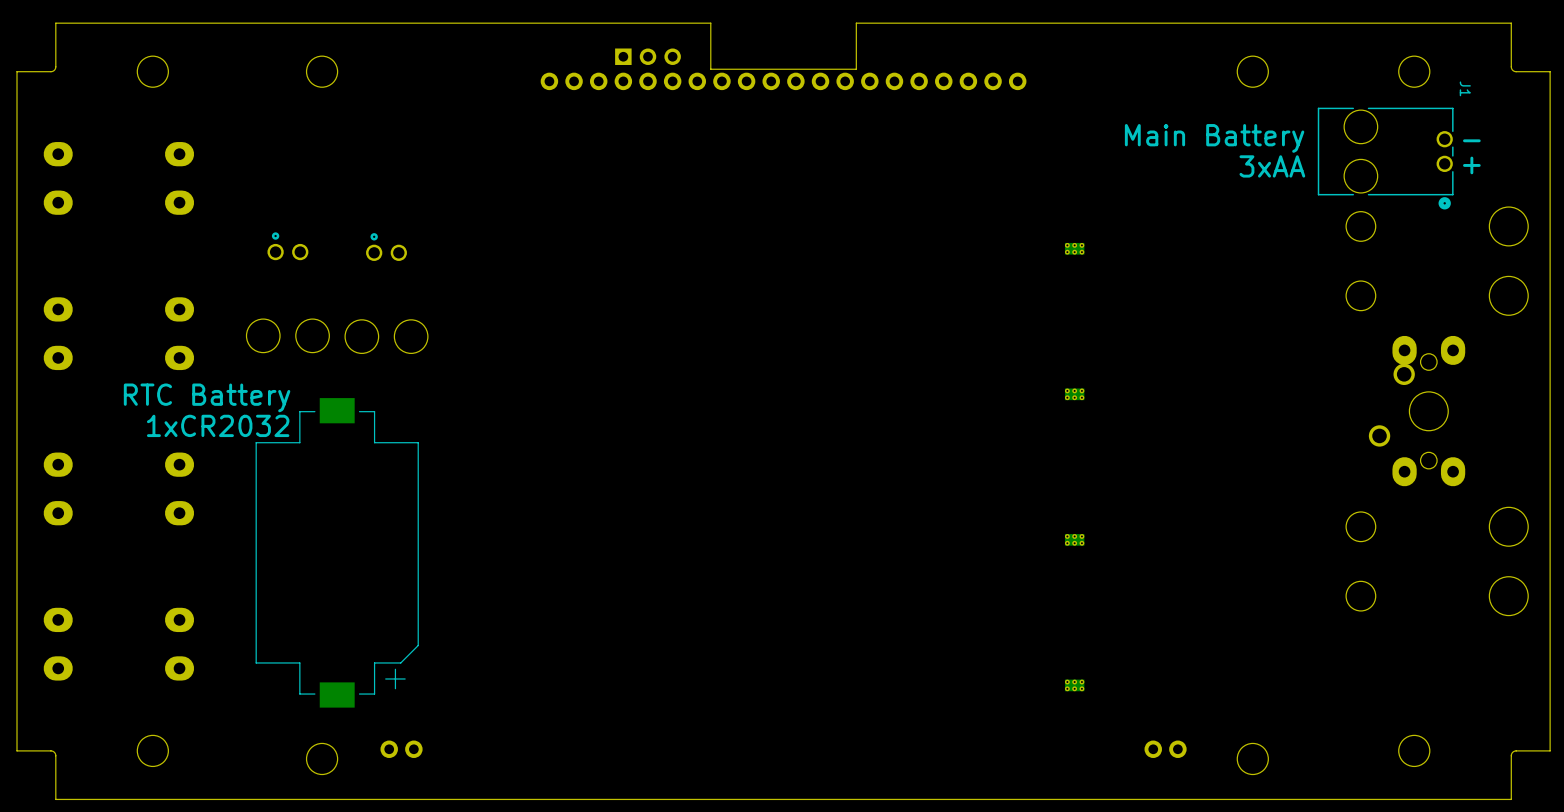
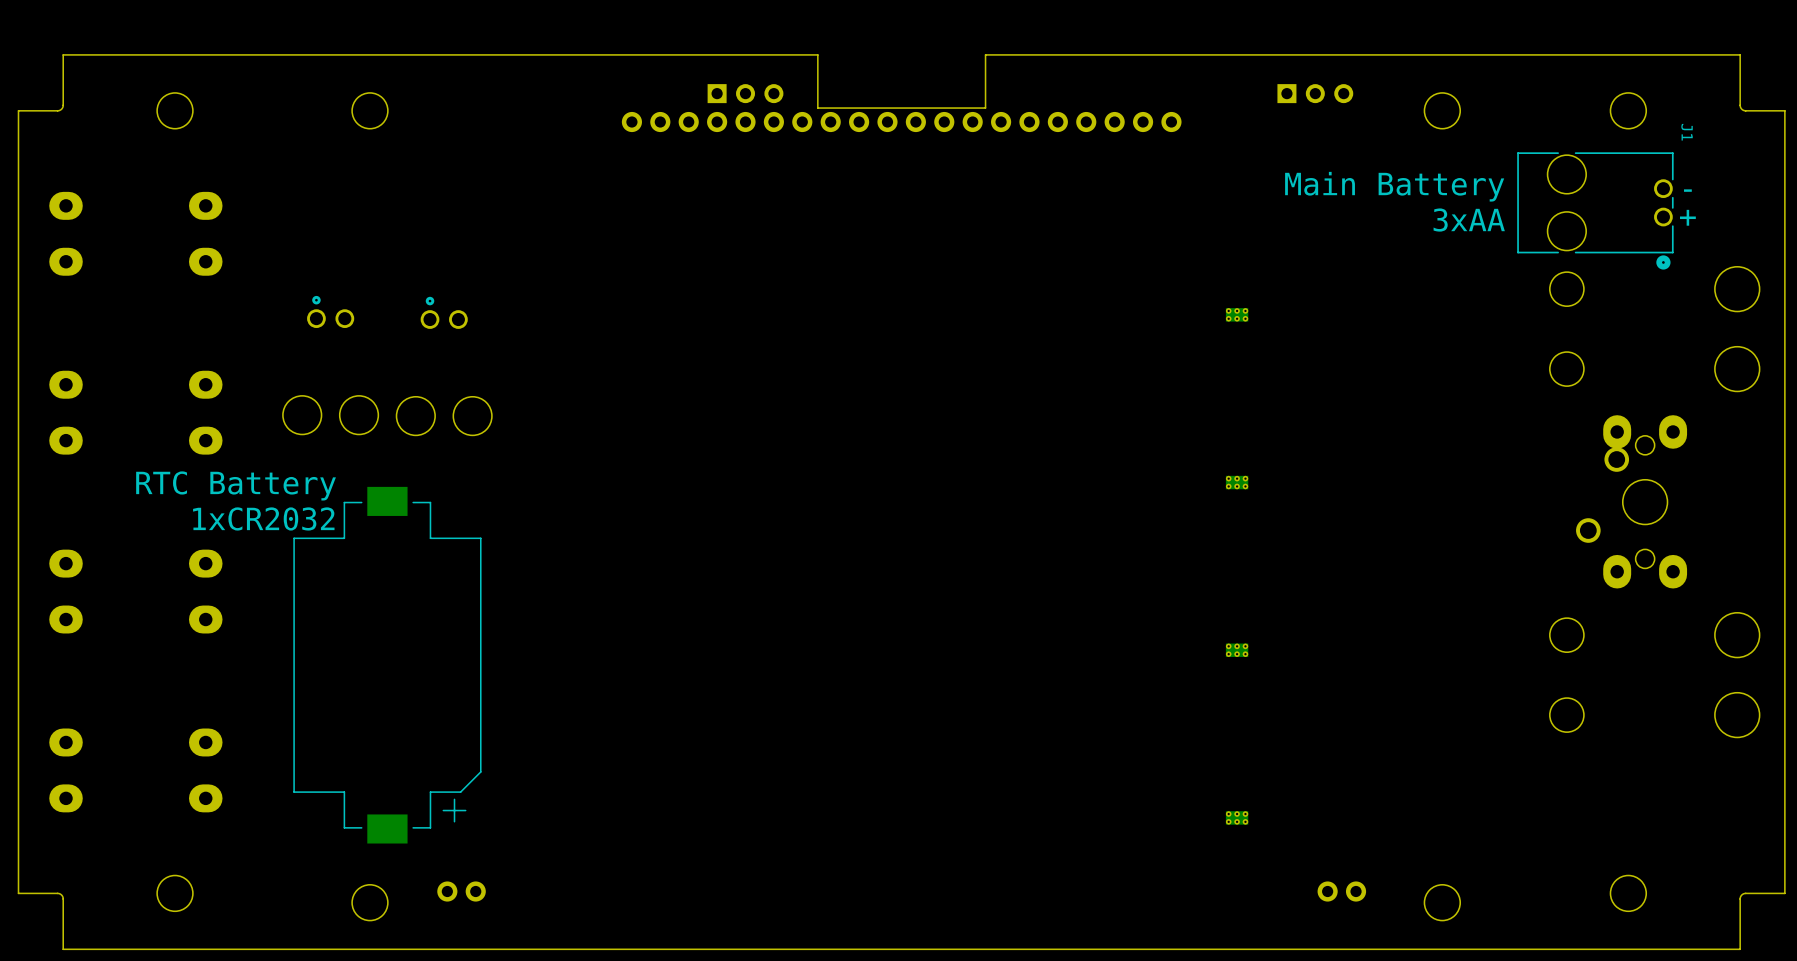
part: none -> (1315, 93)

